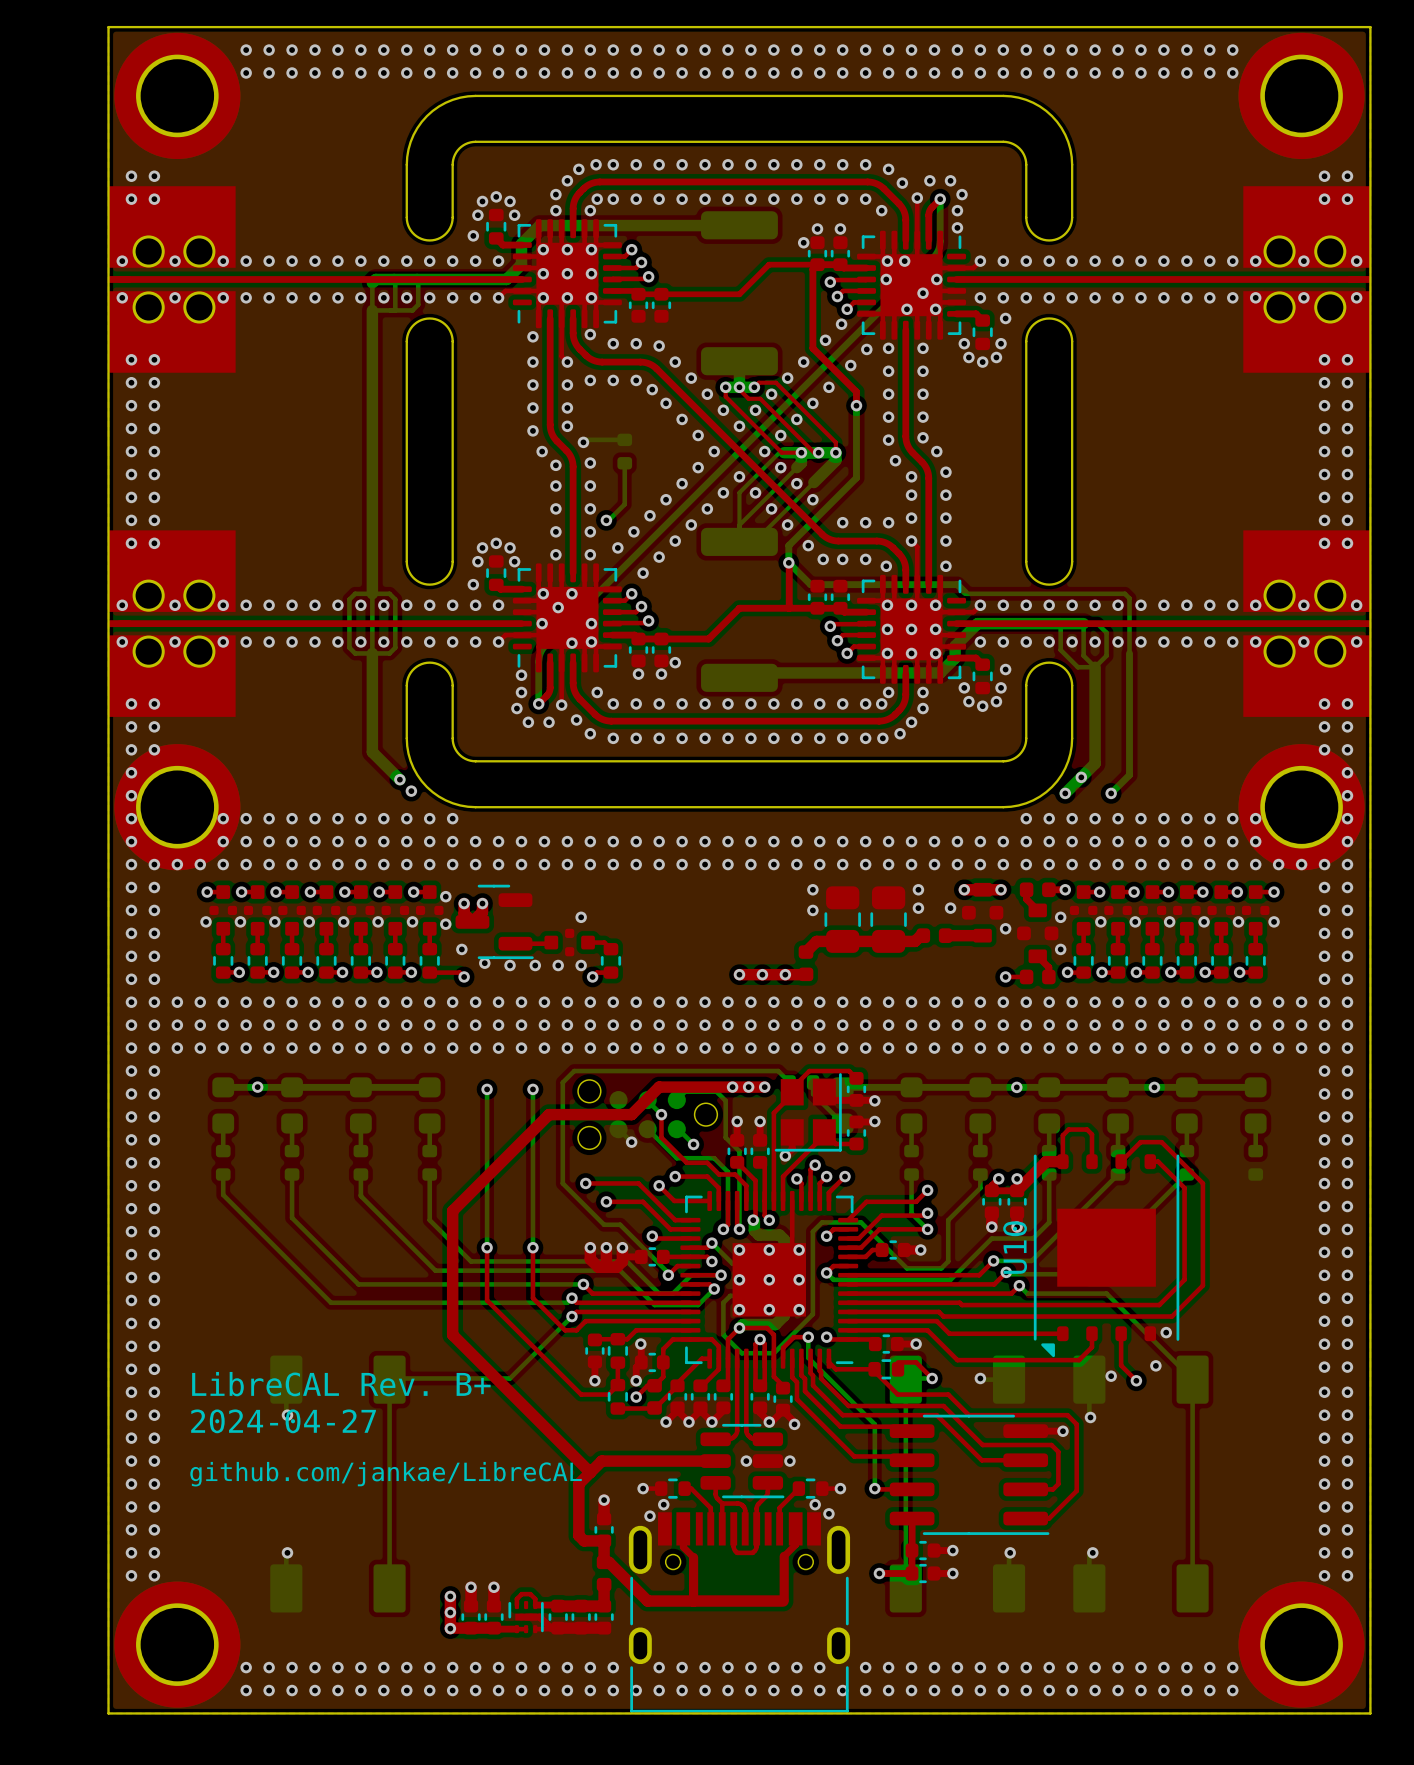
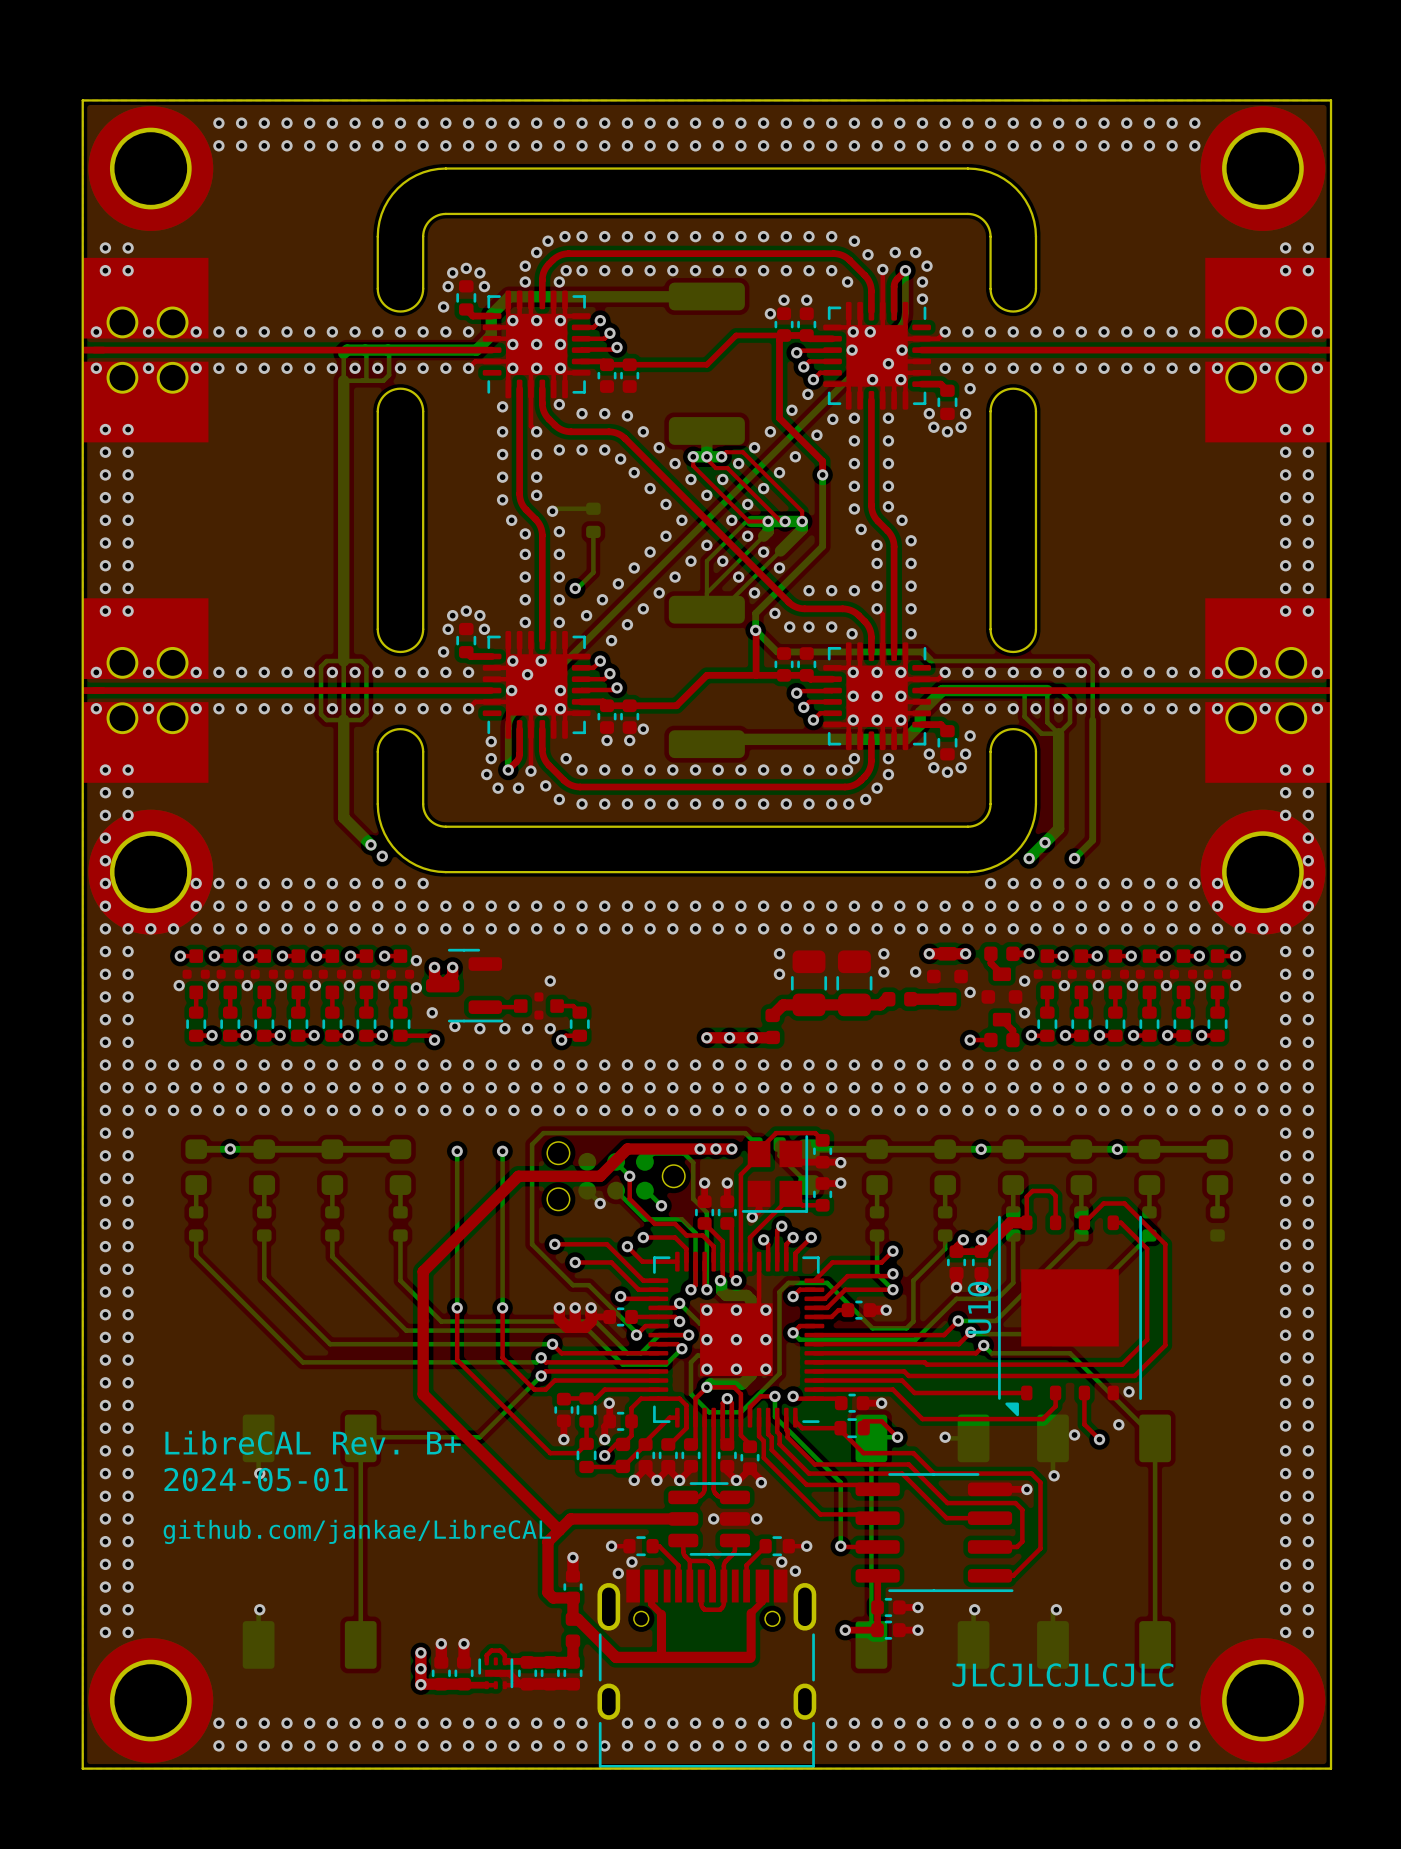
text: 2024-04-27 (283, 1421) -> 2024-05-01 (255, 1479)
text: none -> JLCJLCJLCJLC (1062, 1675)

